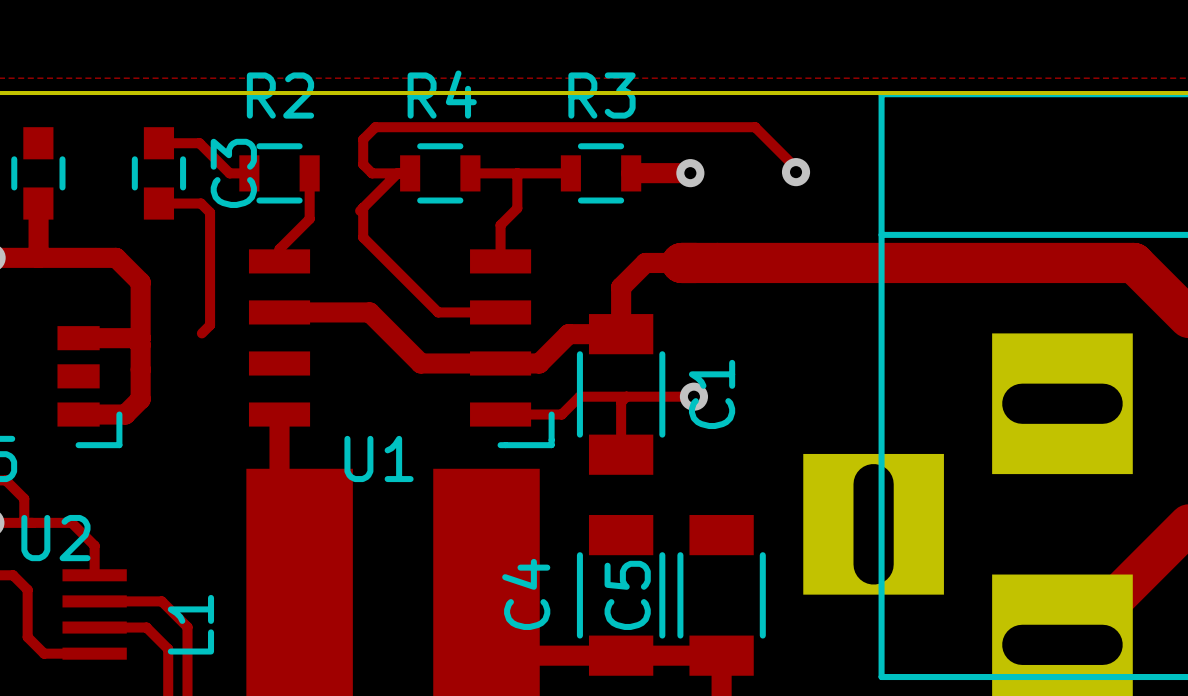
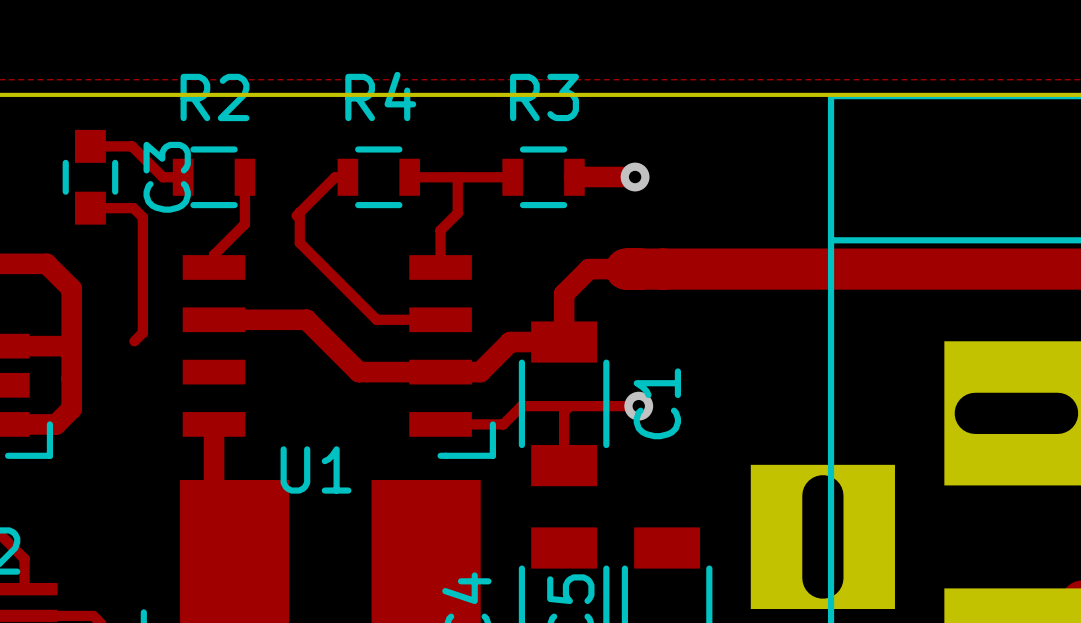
track: (796, 172) (796, 168) (755, 127) (375, 127) (363, 139) (363, 164) (372, 173) (397, 173) -> none
via: (796, 172) -> none

